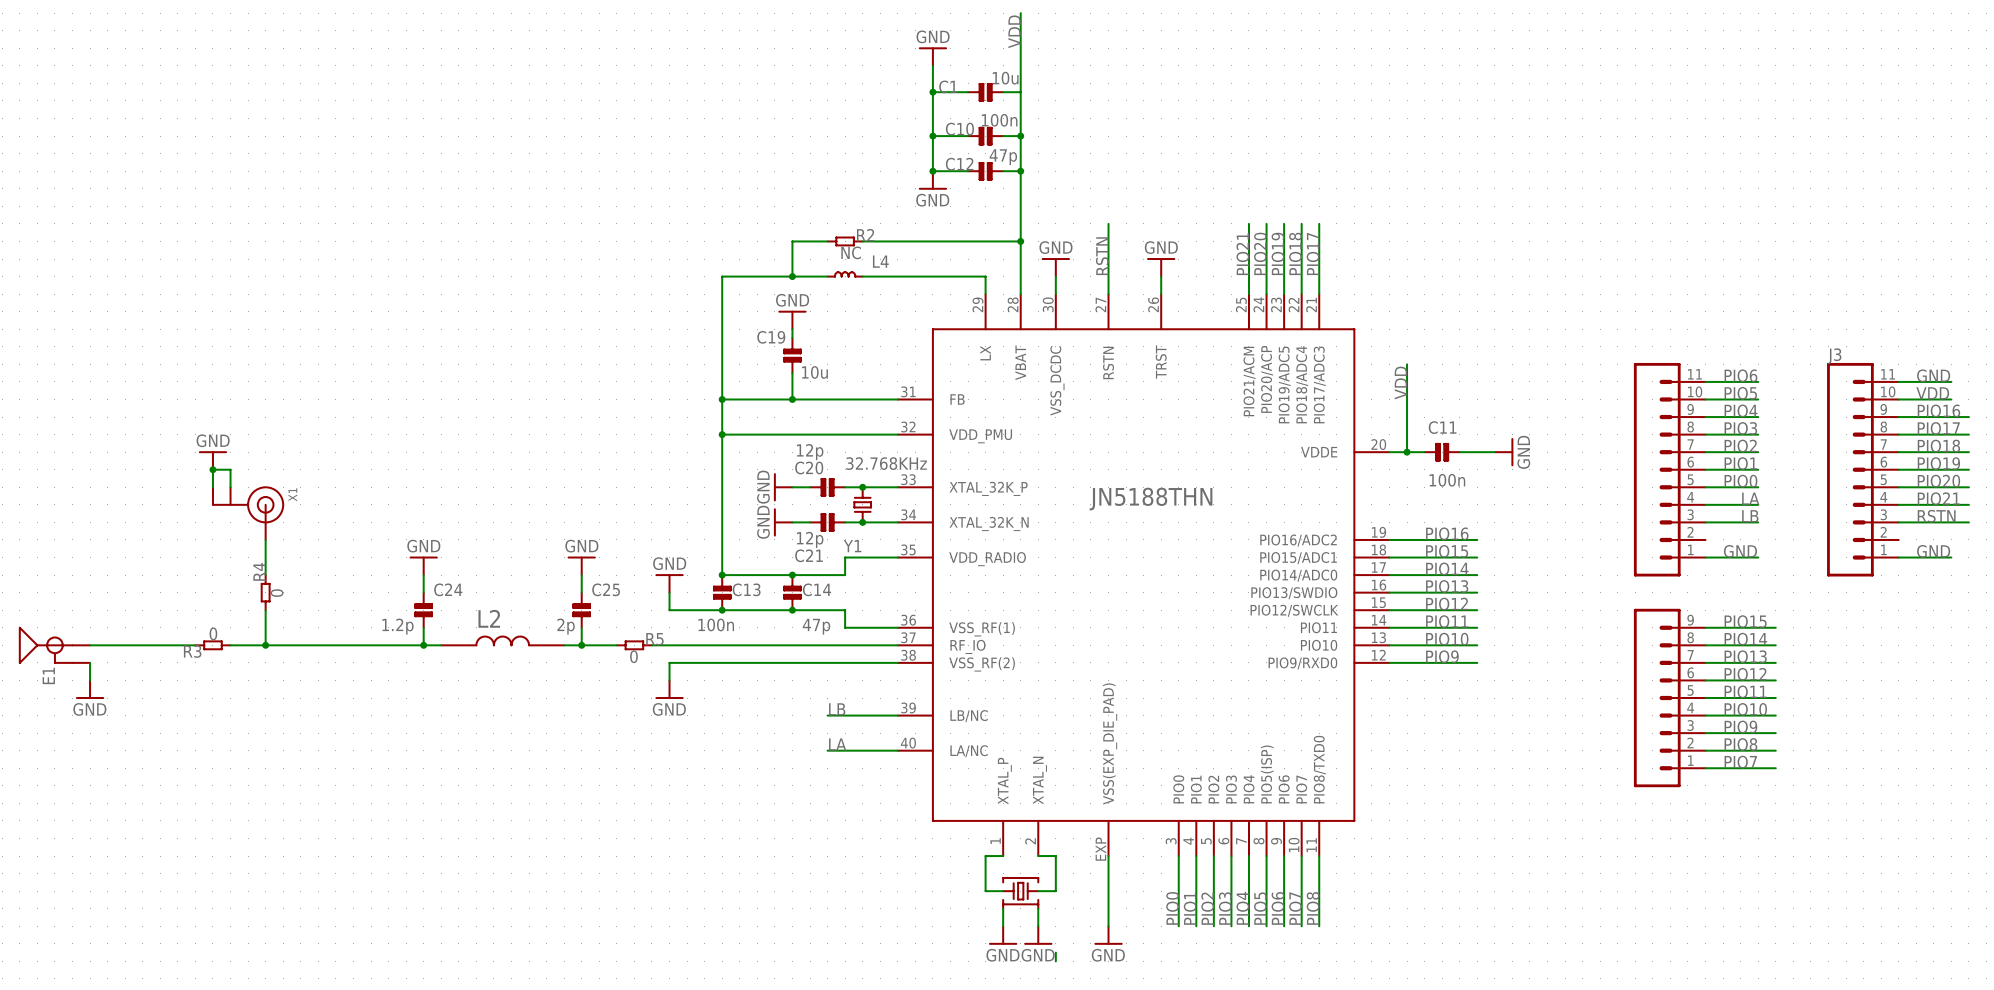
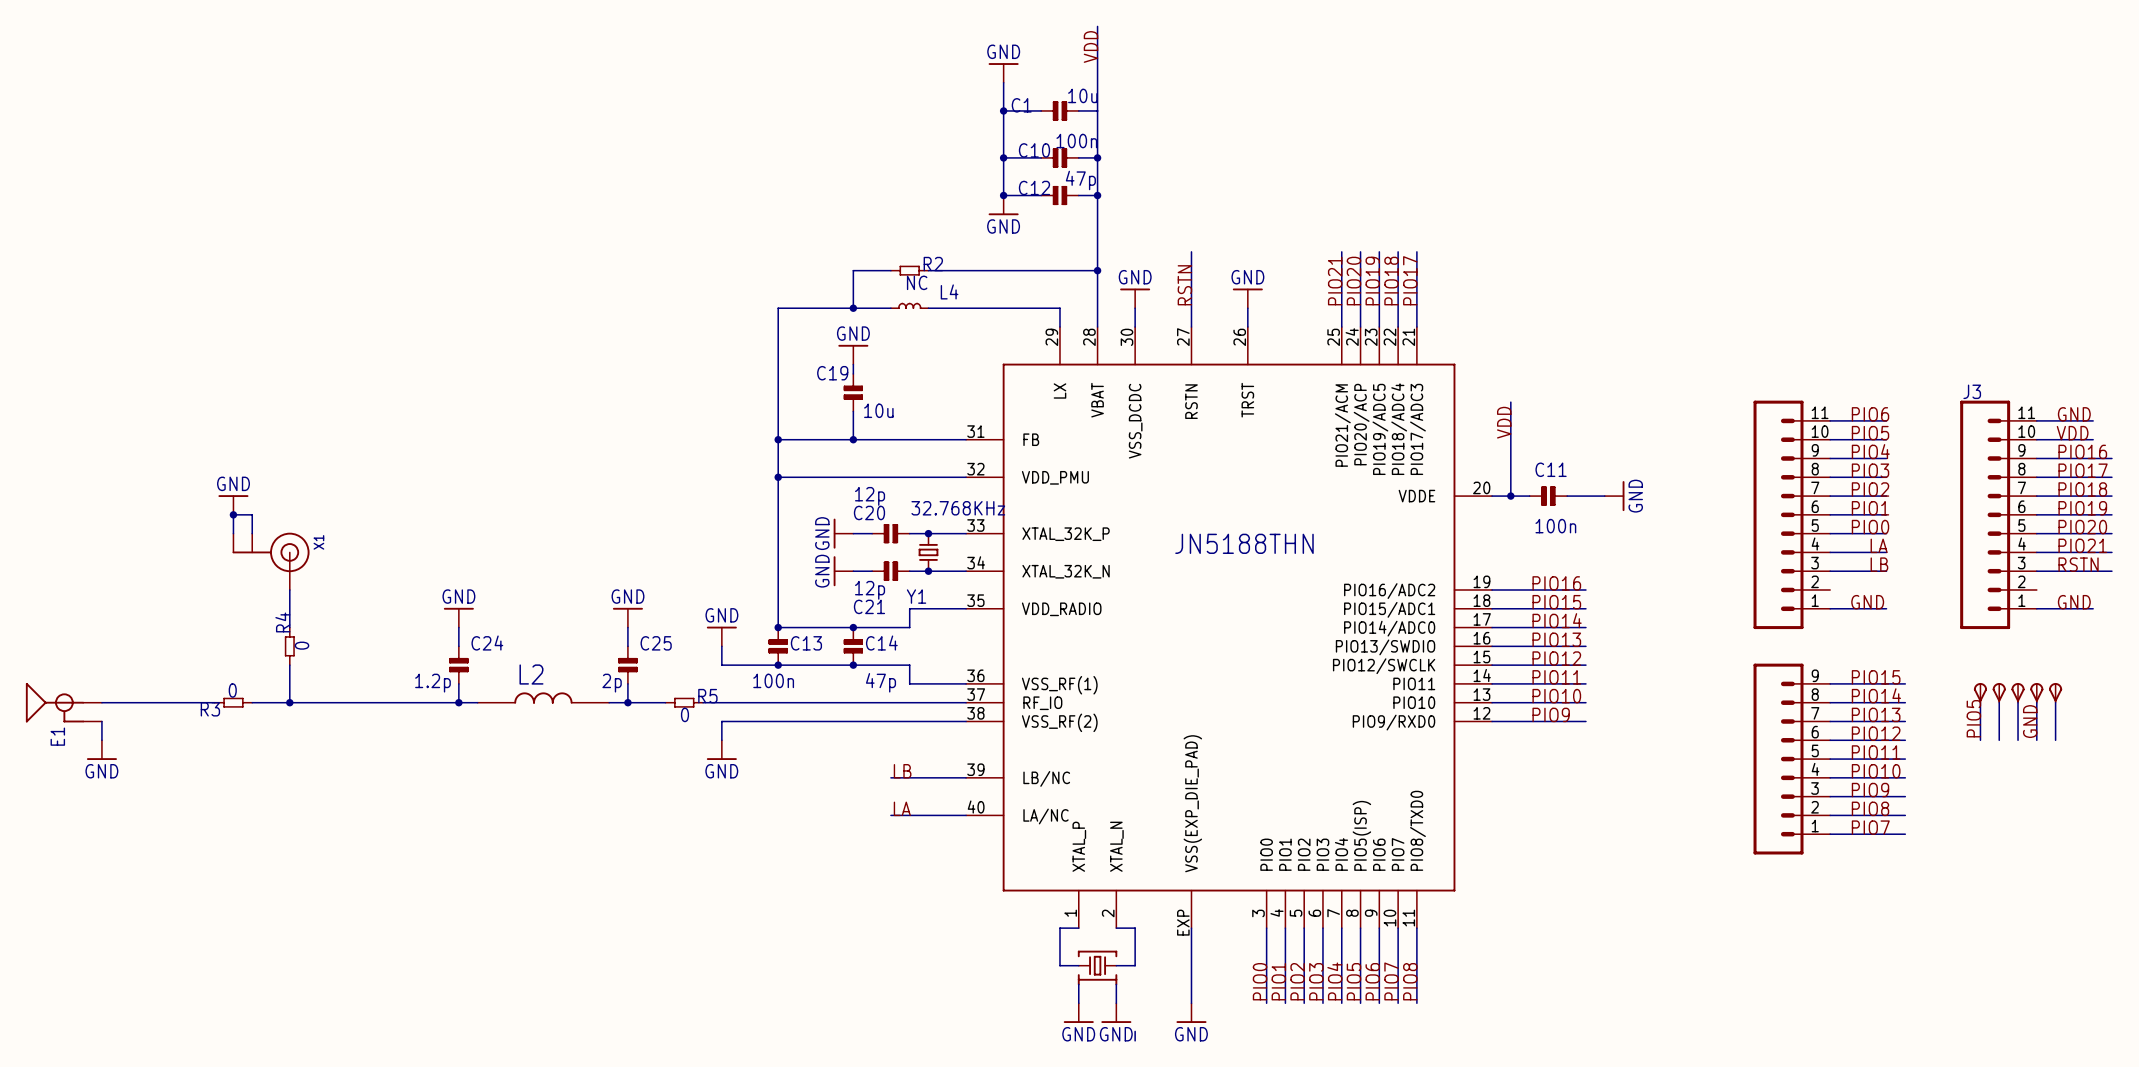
part: none -> (1980, 692)
part: none -> (1999, 692)
part: none -> (2018, 692)
part: none -> (2036, 692)
part: none -> (2055, 692)
wire: none -> (1980, 702) (1980, 740)
wire: none -> (1999, 702) (1999, 740)
wire: none -> (2018, 702) (2018, 740)
wire: none -> (2036, 702) (2036, 740)
wire: none -> (2055, 702) (2055, 740)
label: none -> PIO5 (1973, 718)
label: none -> GND (2030, 721)

